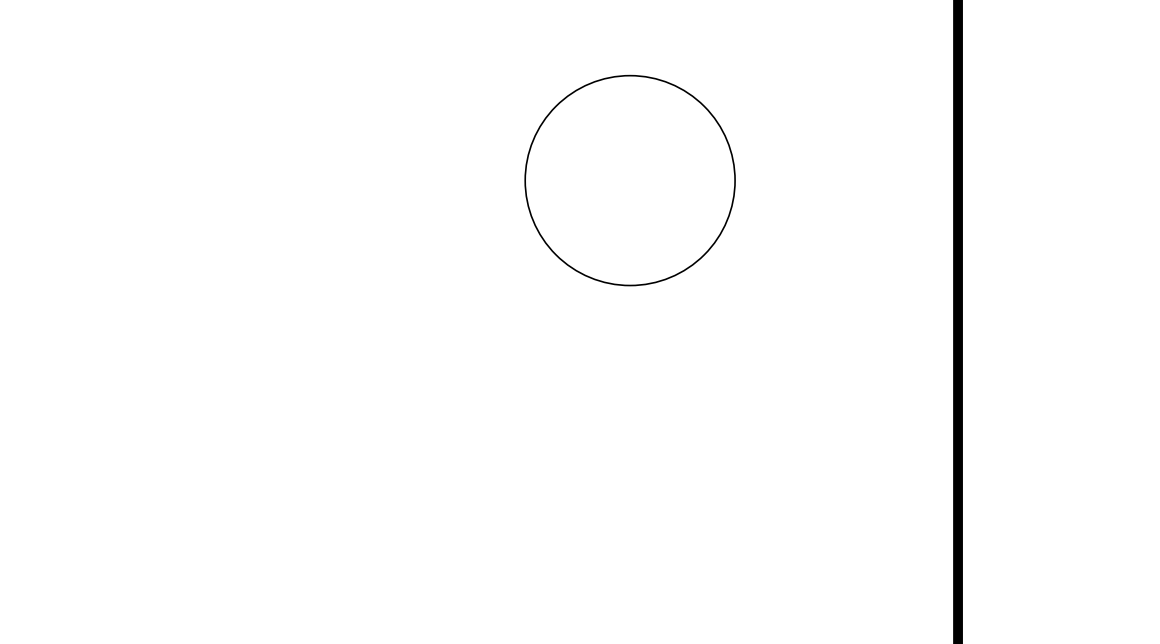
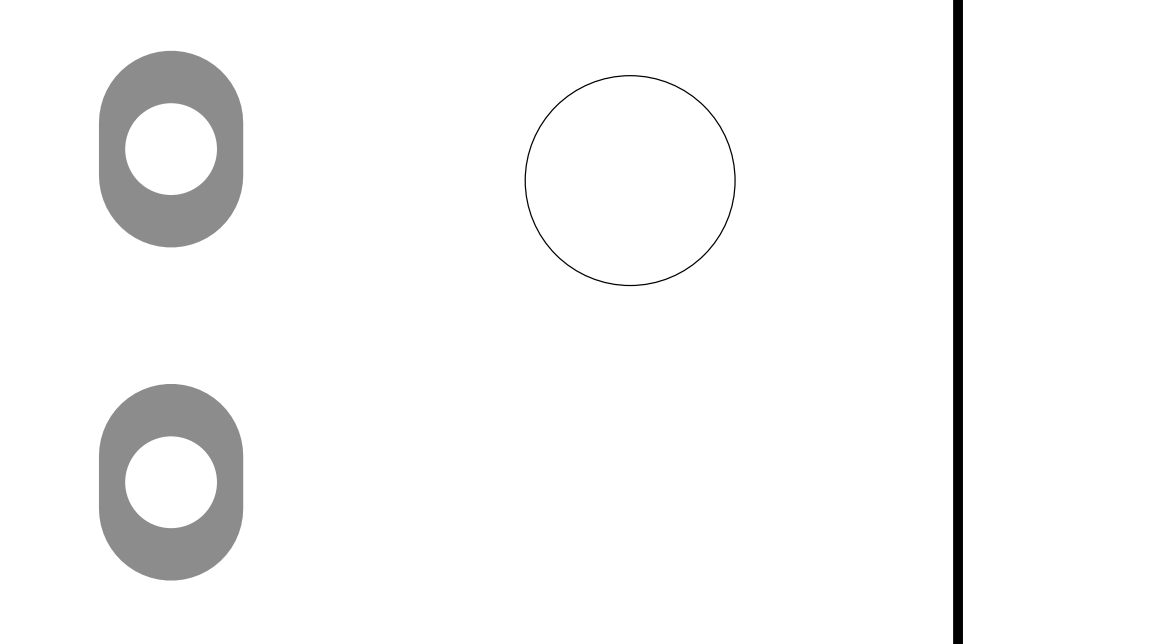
part: none -> (171, 315)

